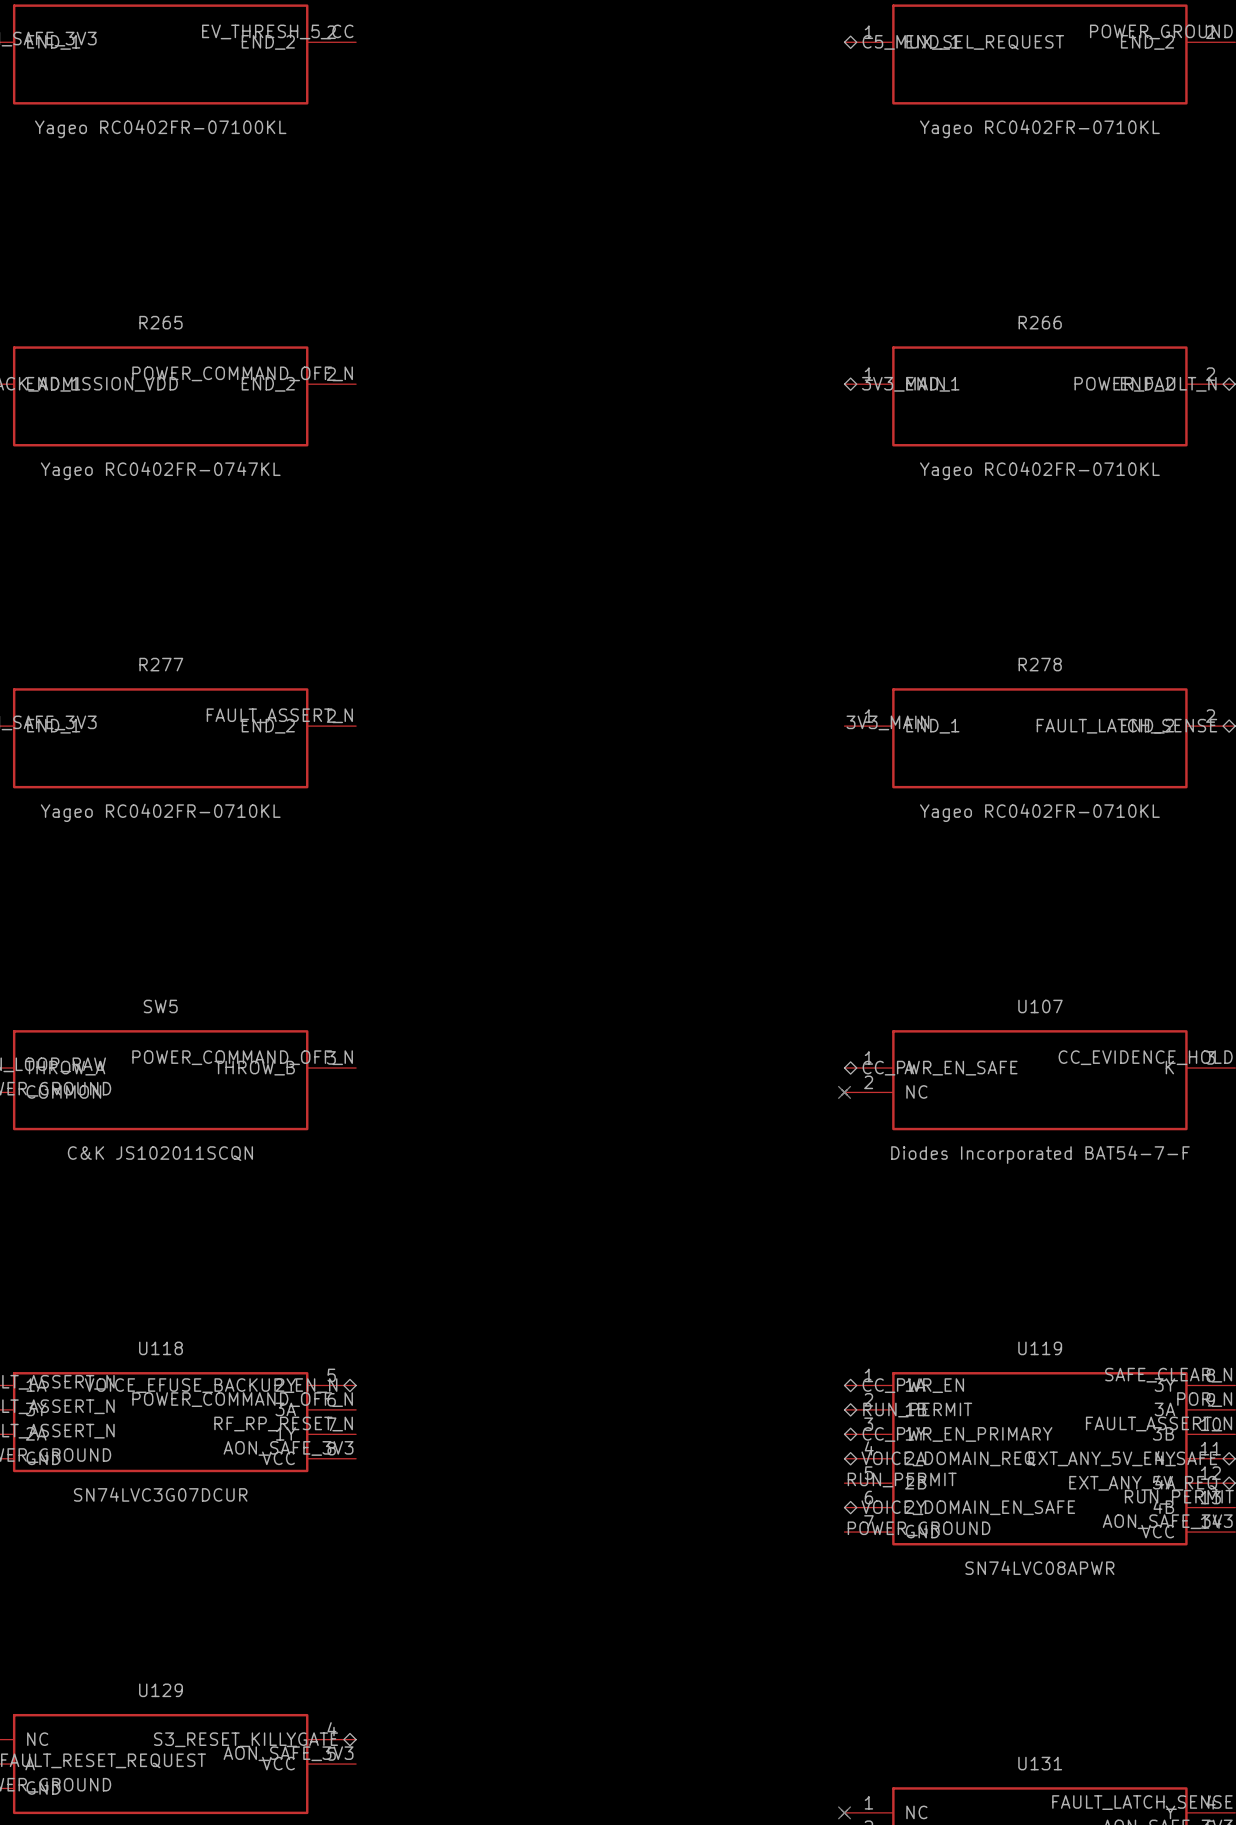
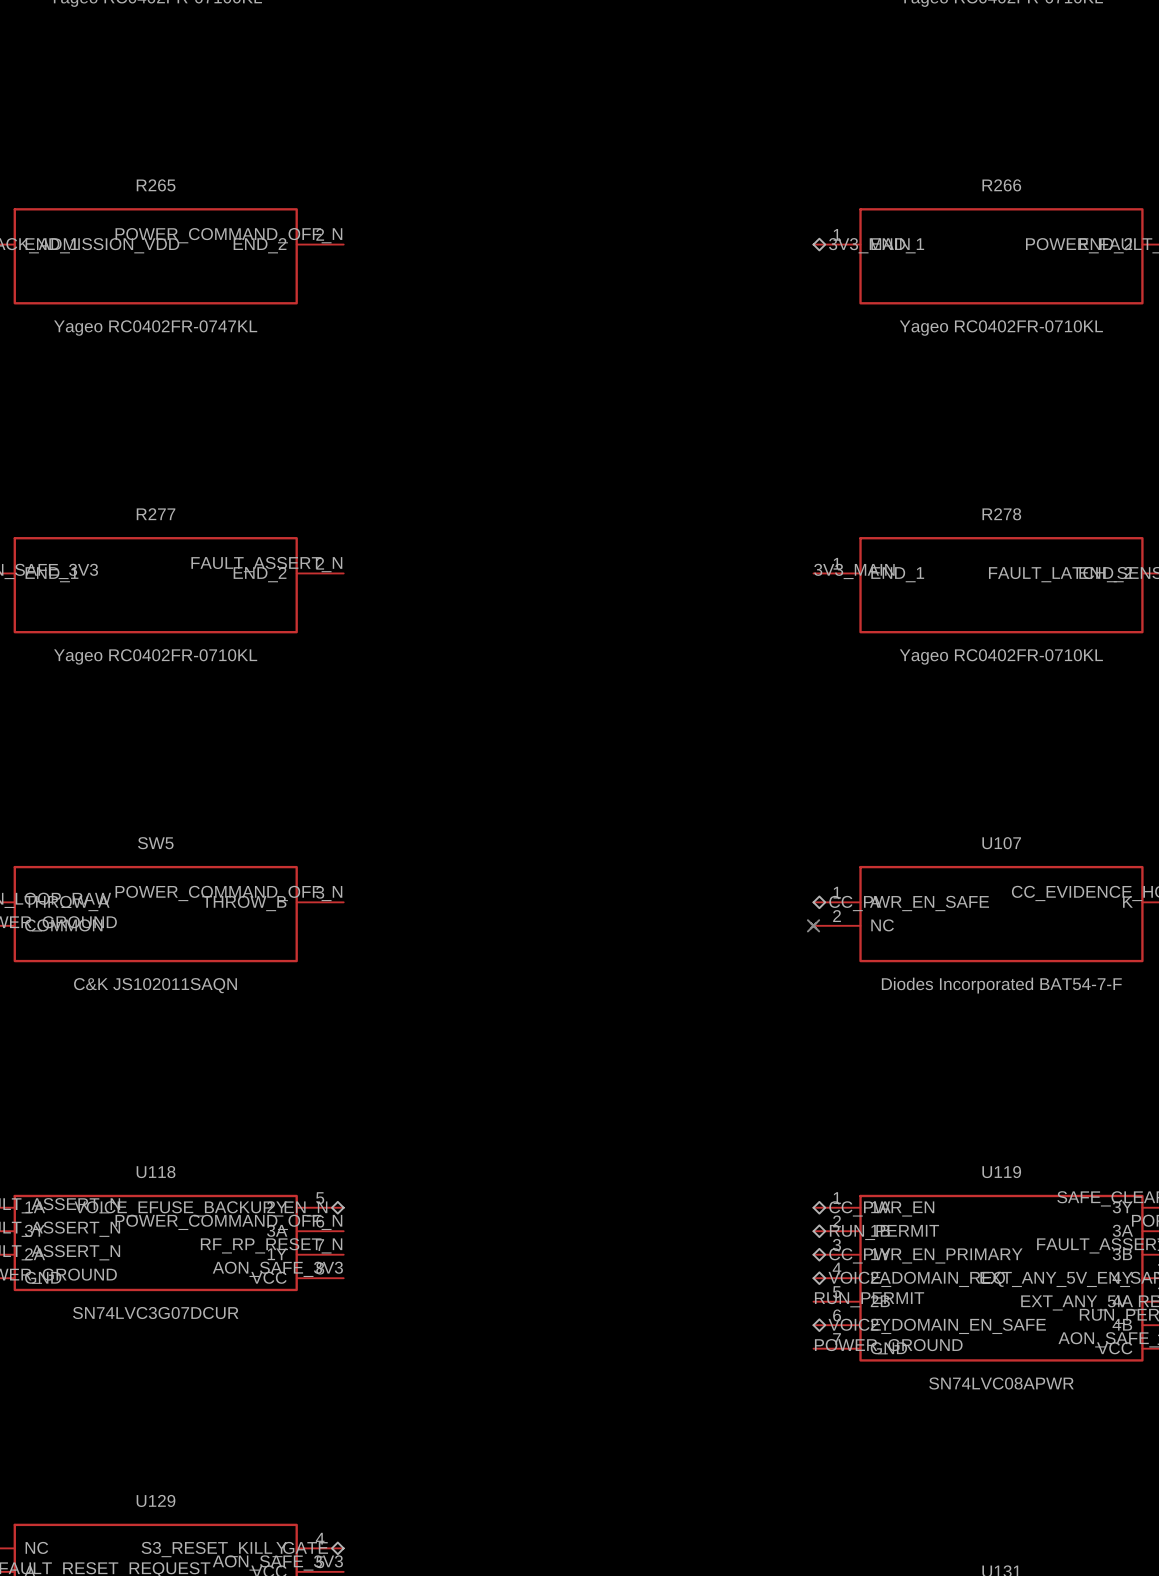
SW5 value: C&K JS102011SCQN (160, 1153) -> C&K JS102011SAQN (155, 985)

